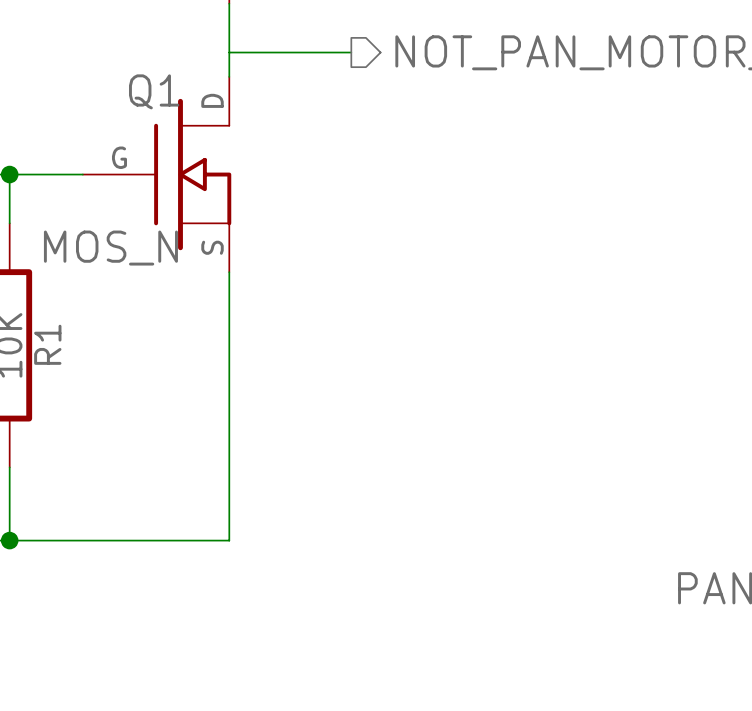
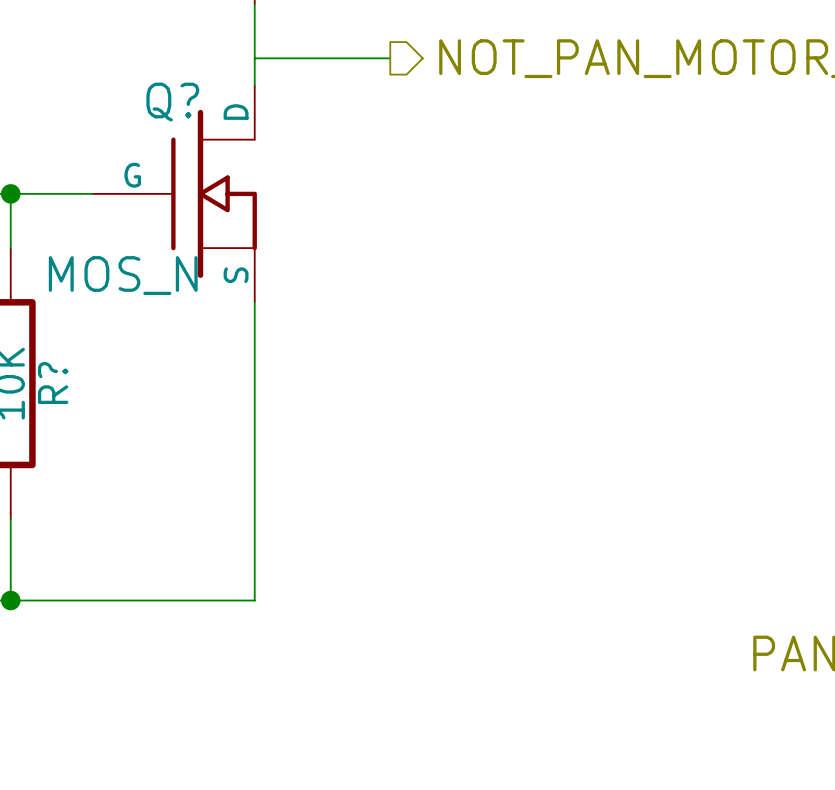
Q1 name: Q1 (154, 91) -> Q? (172, 102)
R1 name: R1 (47, 344) -> R? (53, 383)

